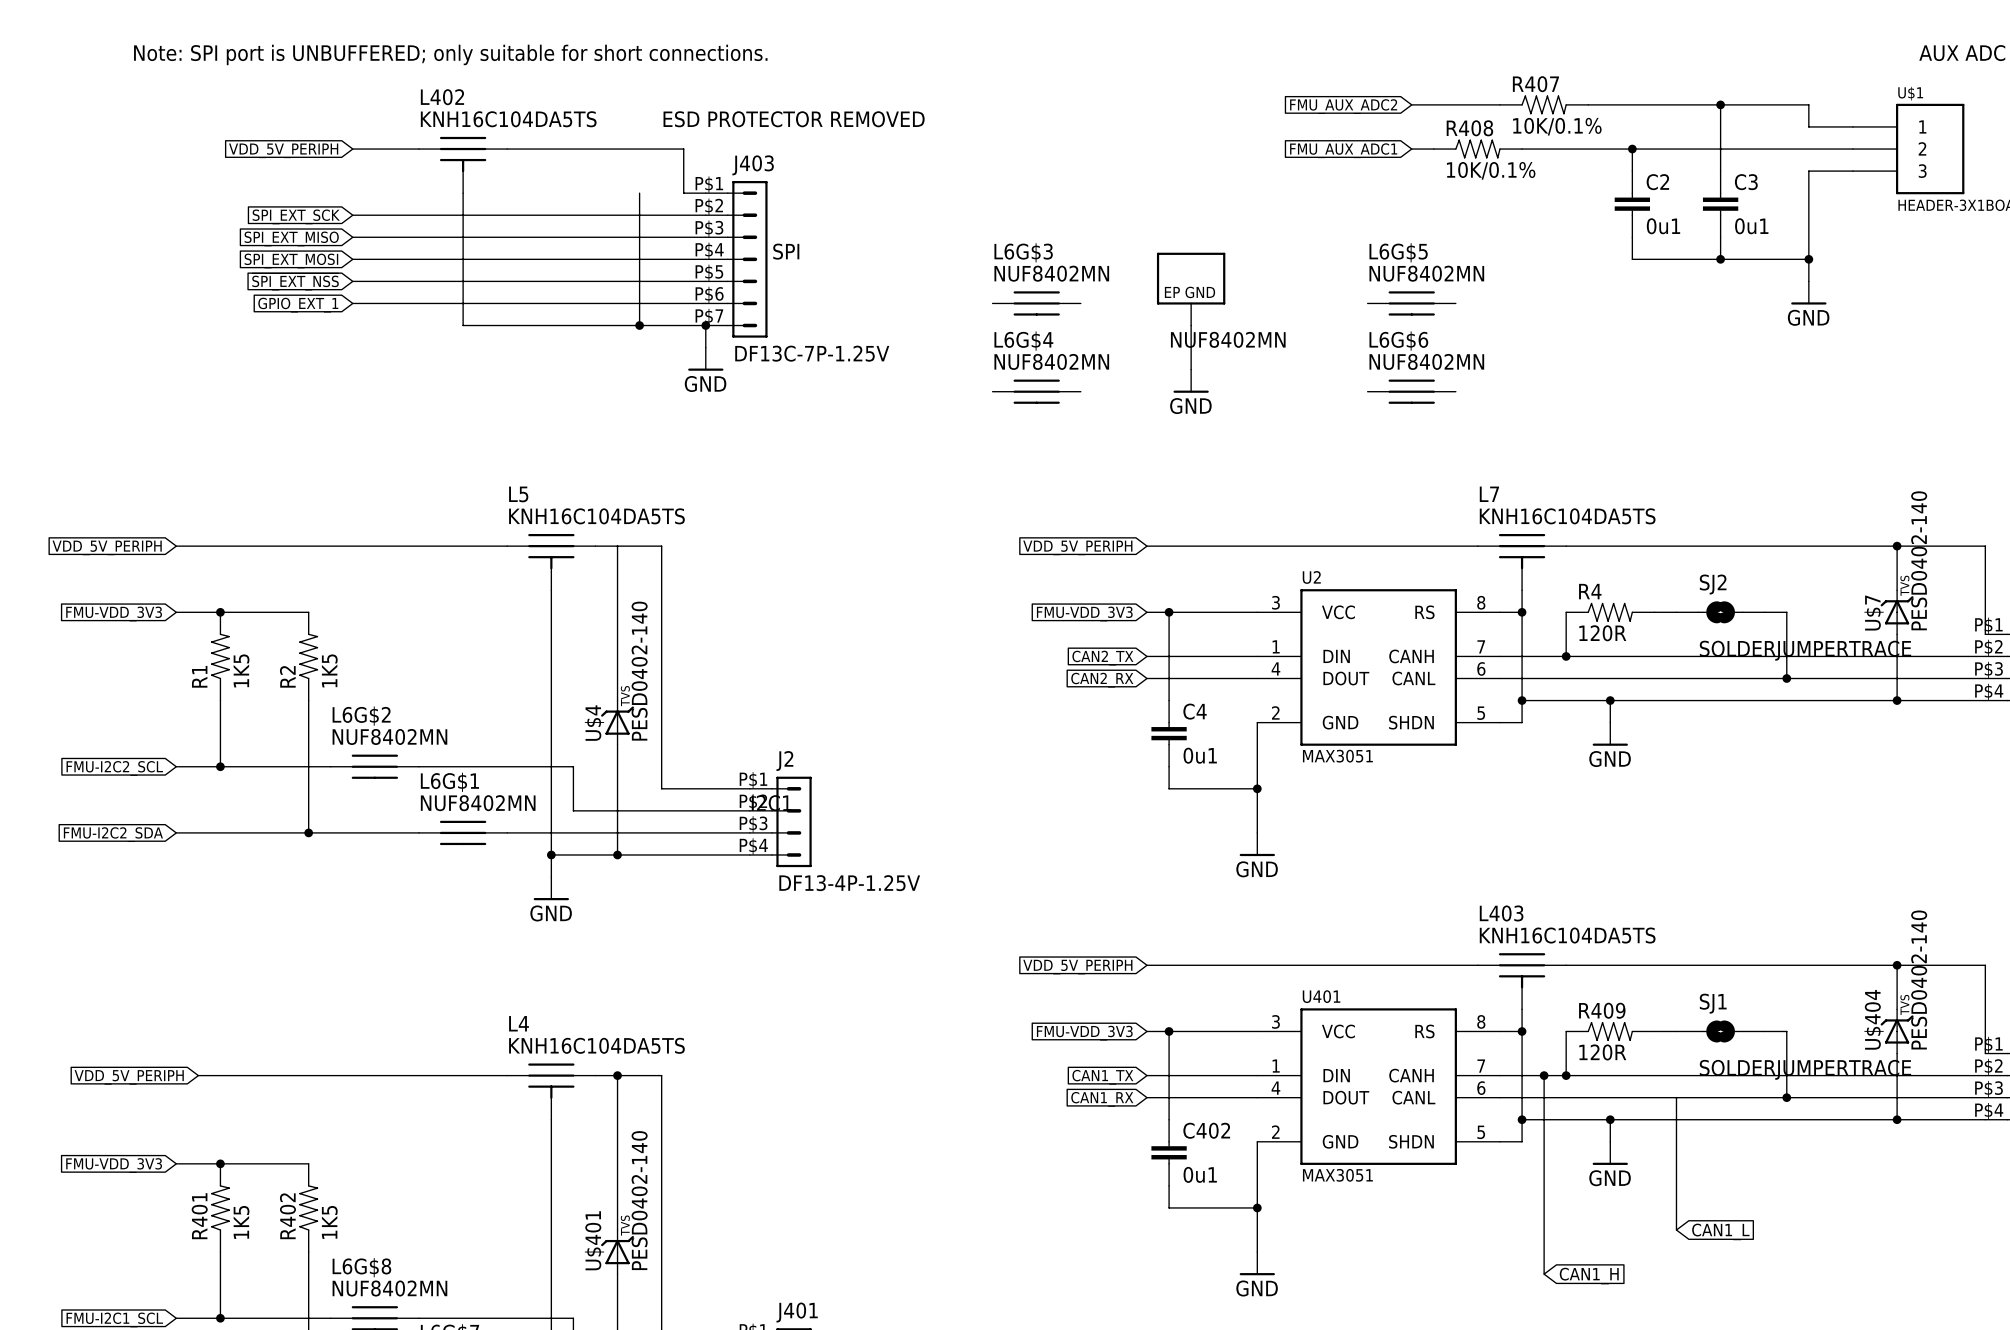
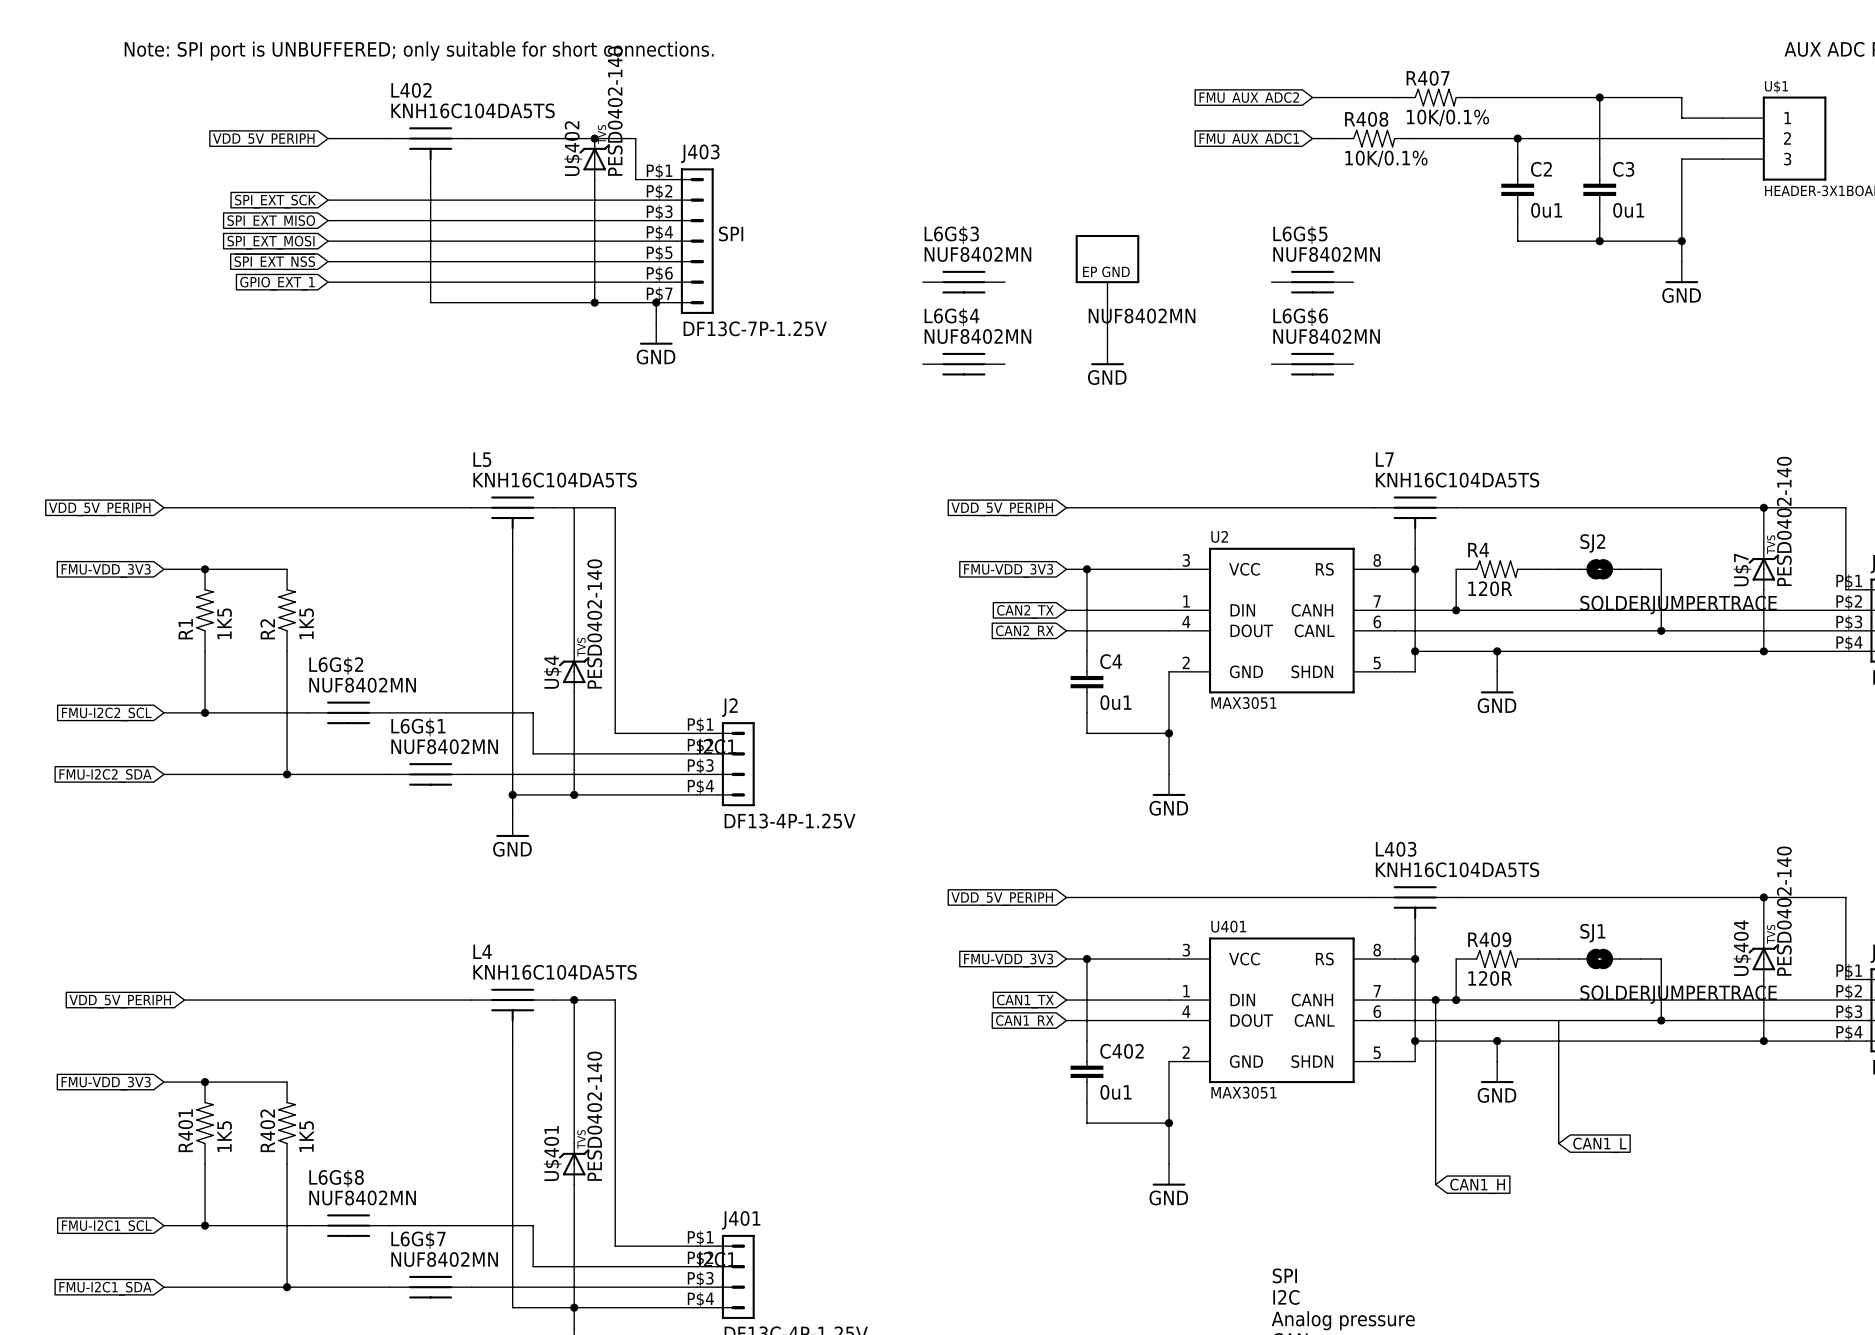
text: ESD PROTECTOR REMOVED (794, 119) -> none
junction: none -> (594, 138)
U$402: none -> PESD0402-140 (594, 159)

